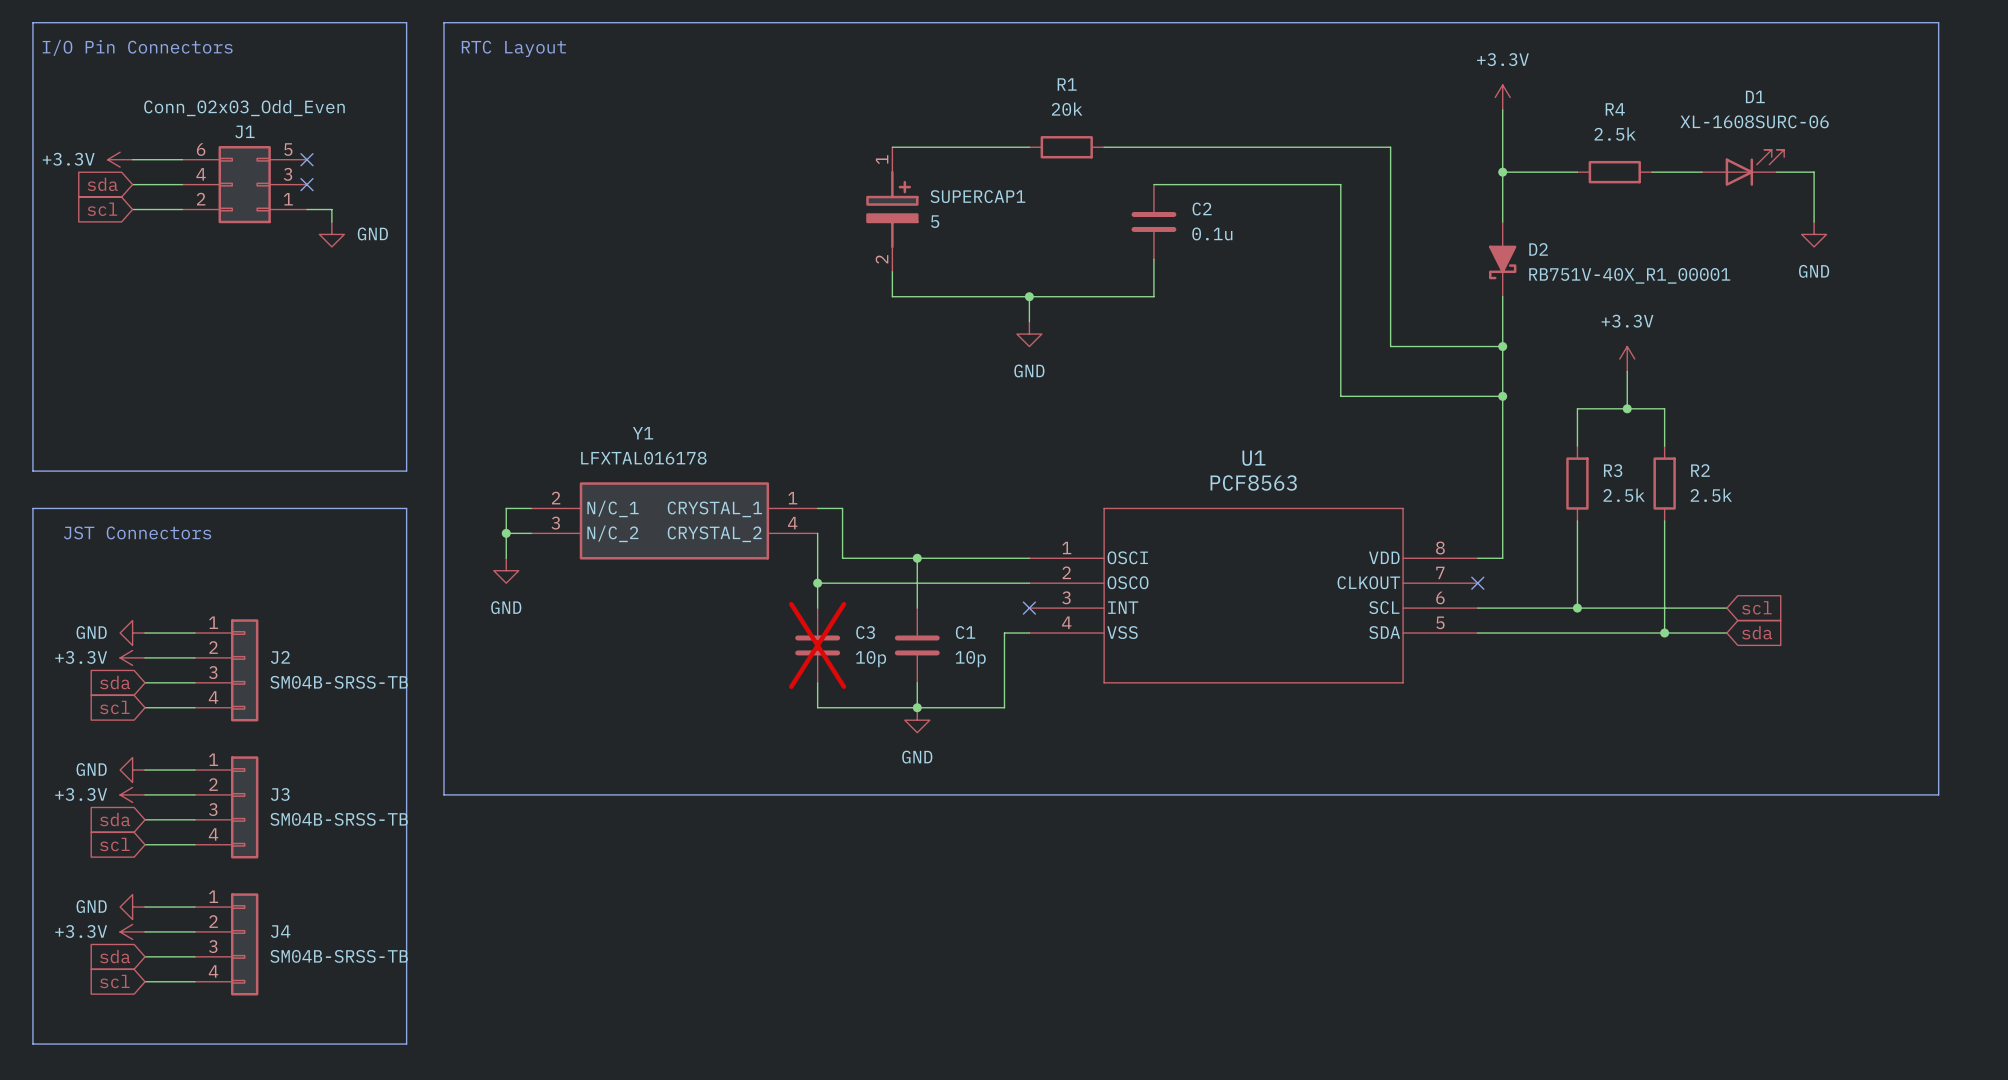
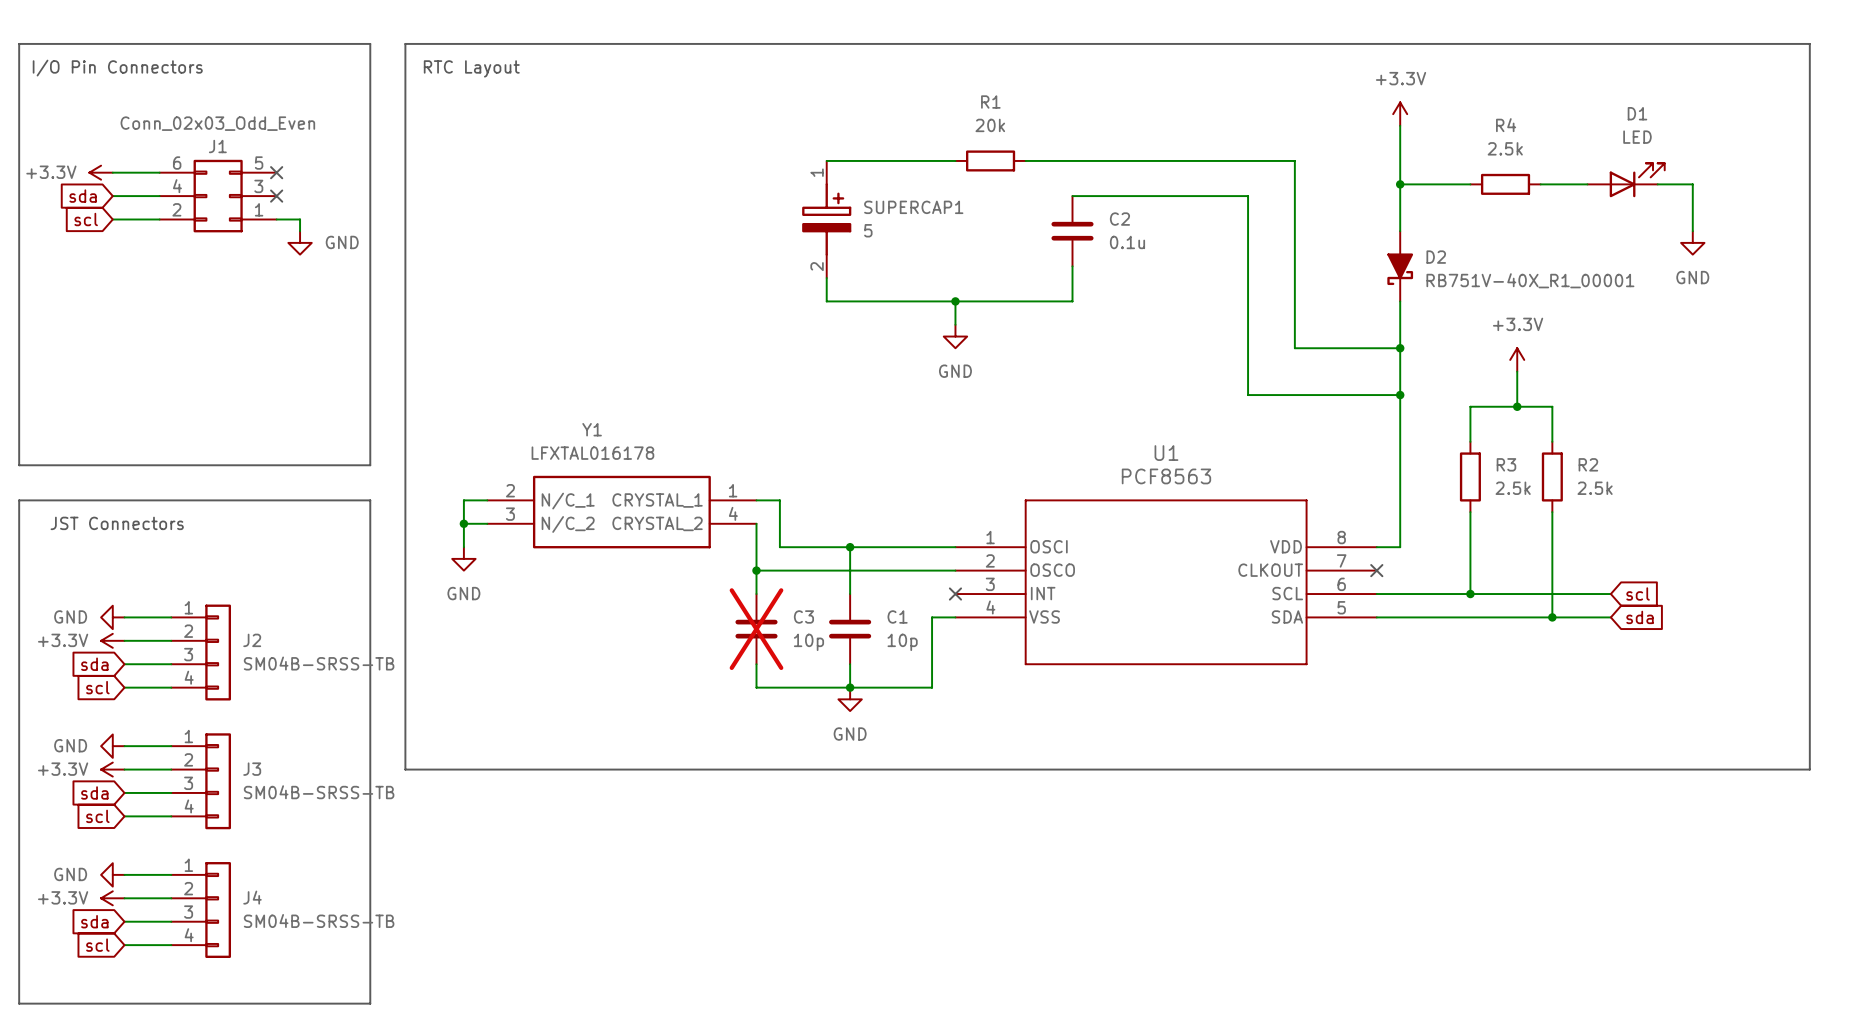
D1 value: XL-1608SURC-06 (1754, 121) -> LED (1637, 137)

